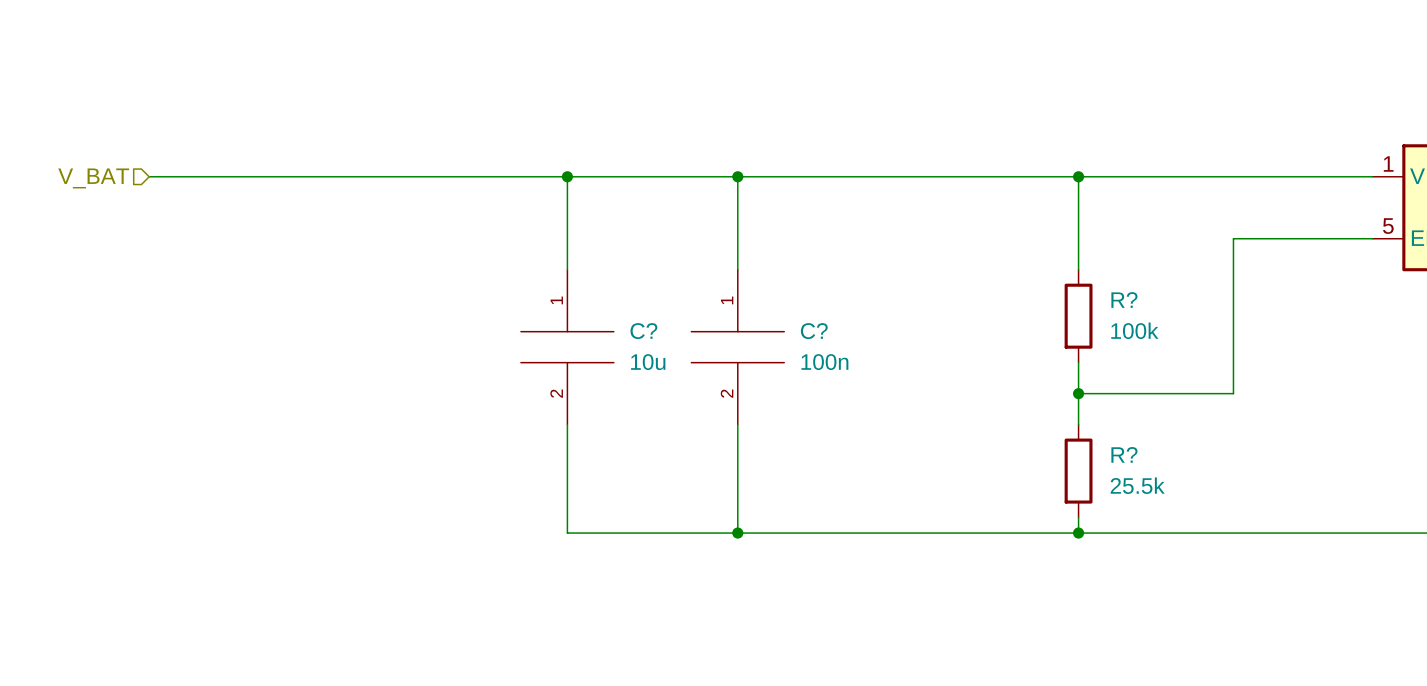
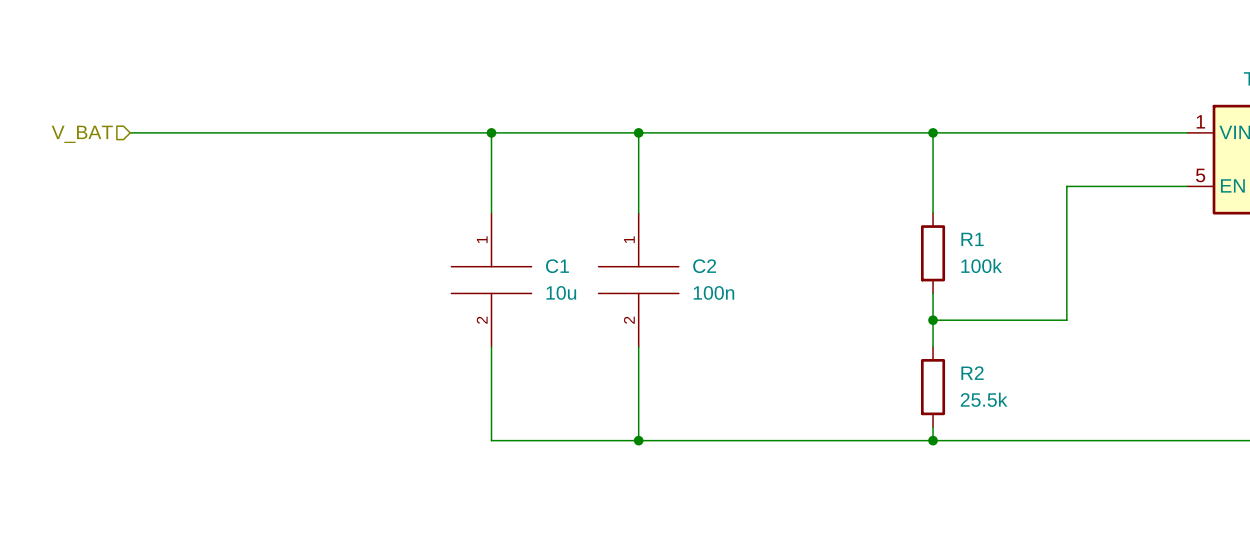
R? name: R? (1124, 300) -> R1 (972, 239)
C? name: C? (643, 331) -> C1 (557, 266)
C? name: C? (814, 331) -> C2 (704, 266)
R? name: R? (1124, 454) -> R2 (972, 373)

